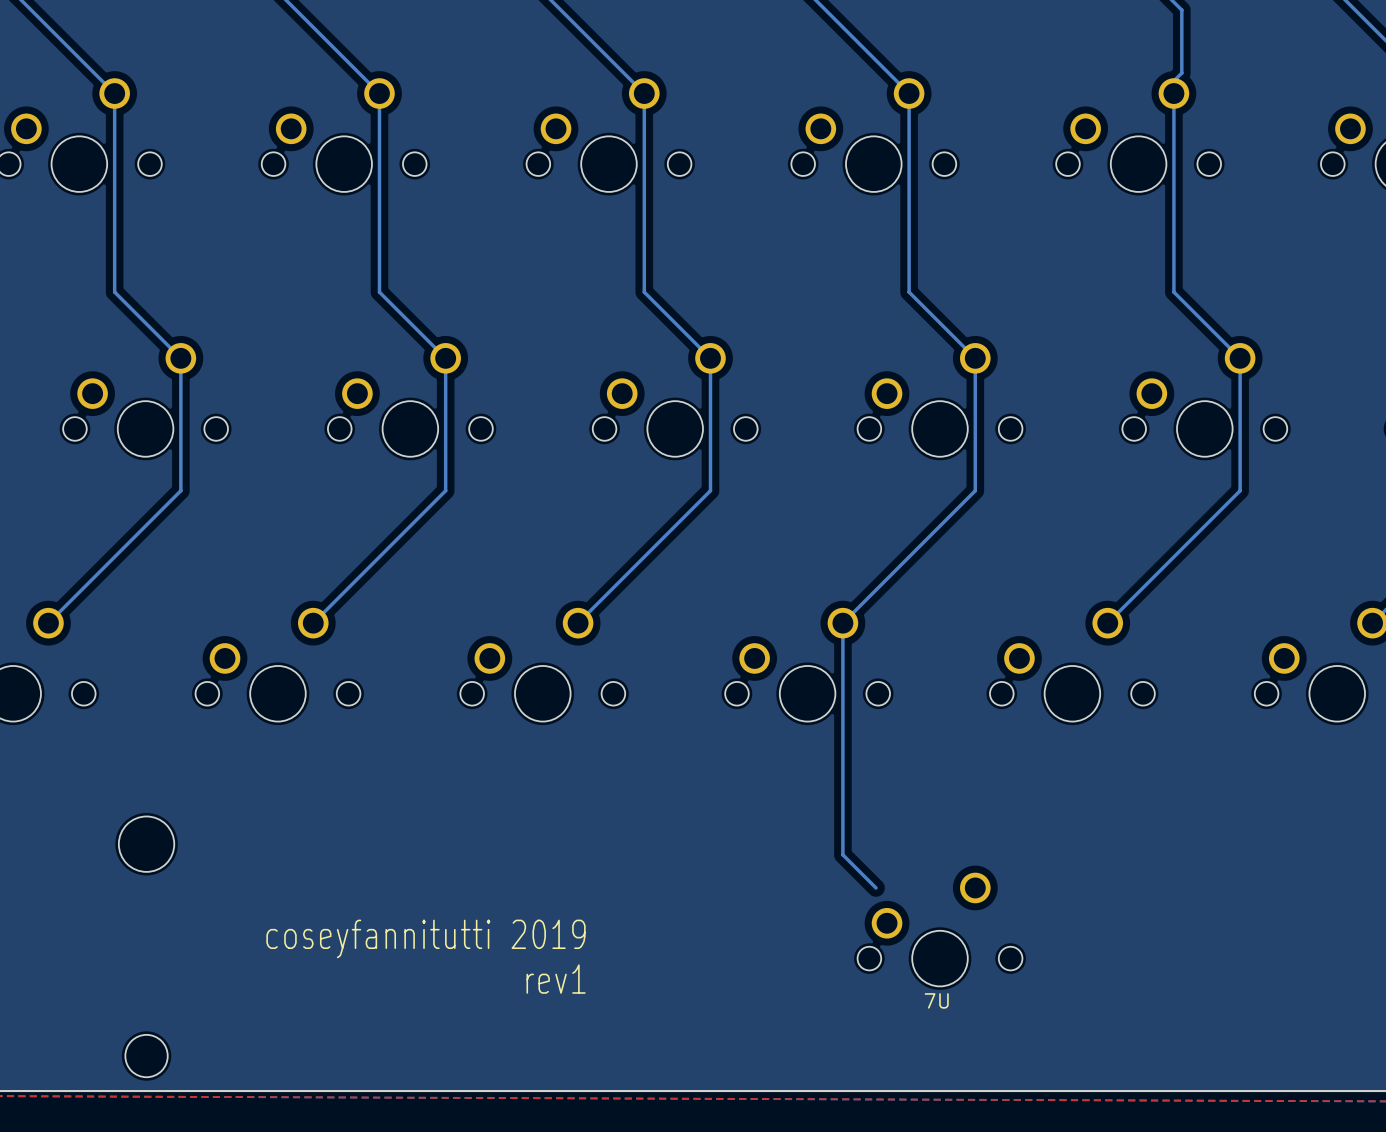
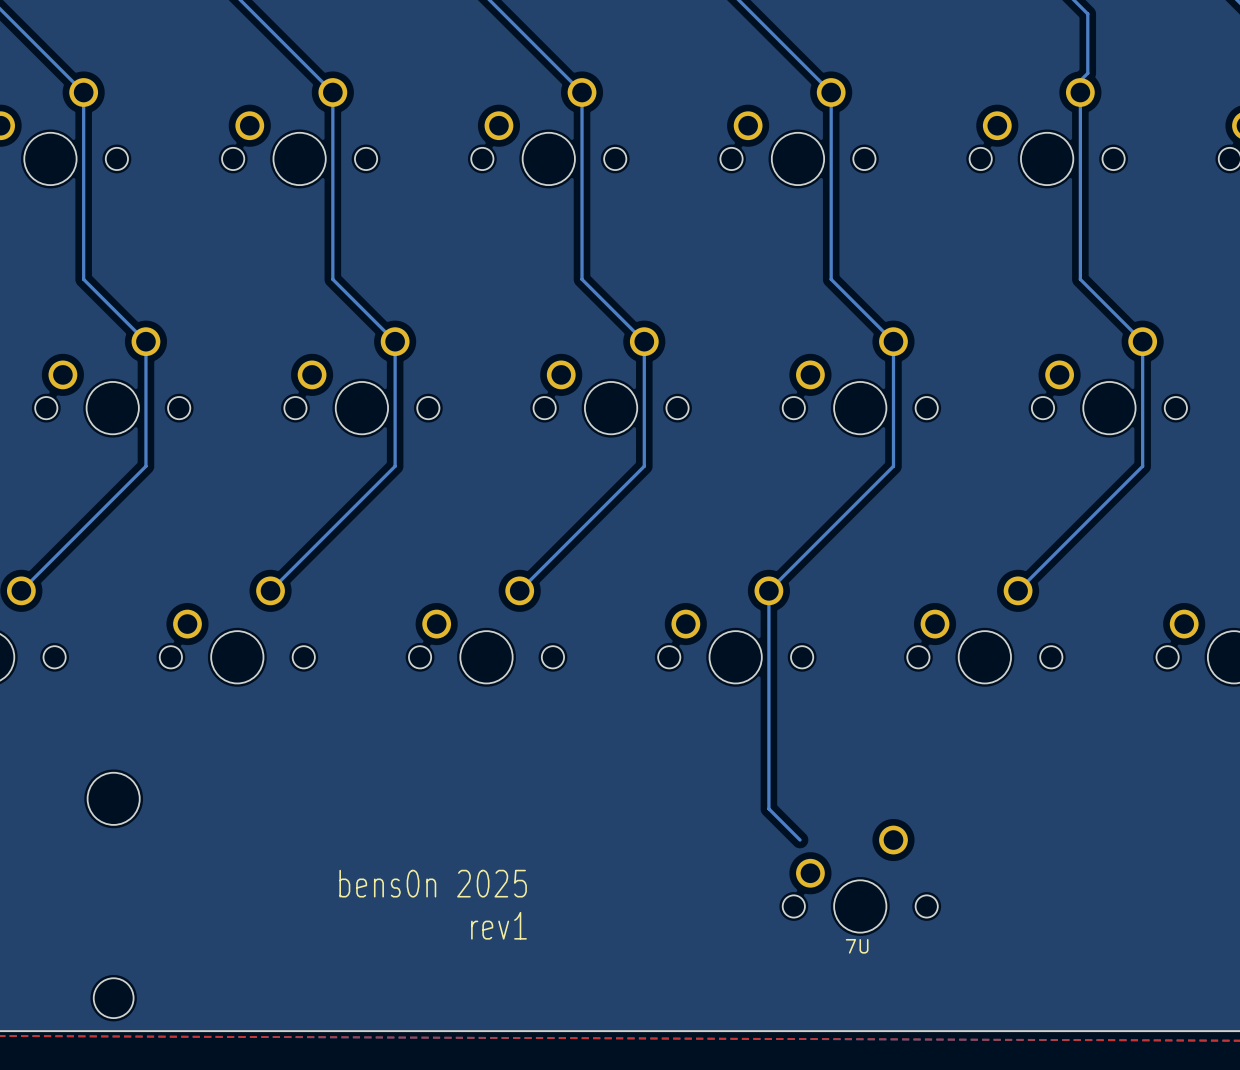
text: coseyfannitutti 2019 (426, 938) -> bens0n 2025 (433, 883)

